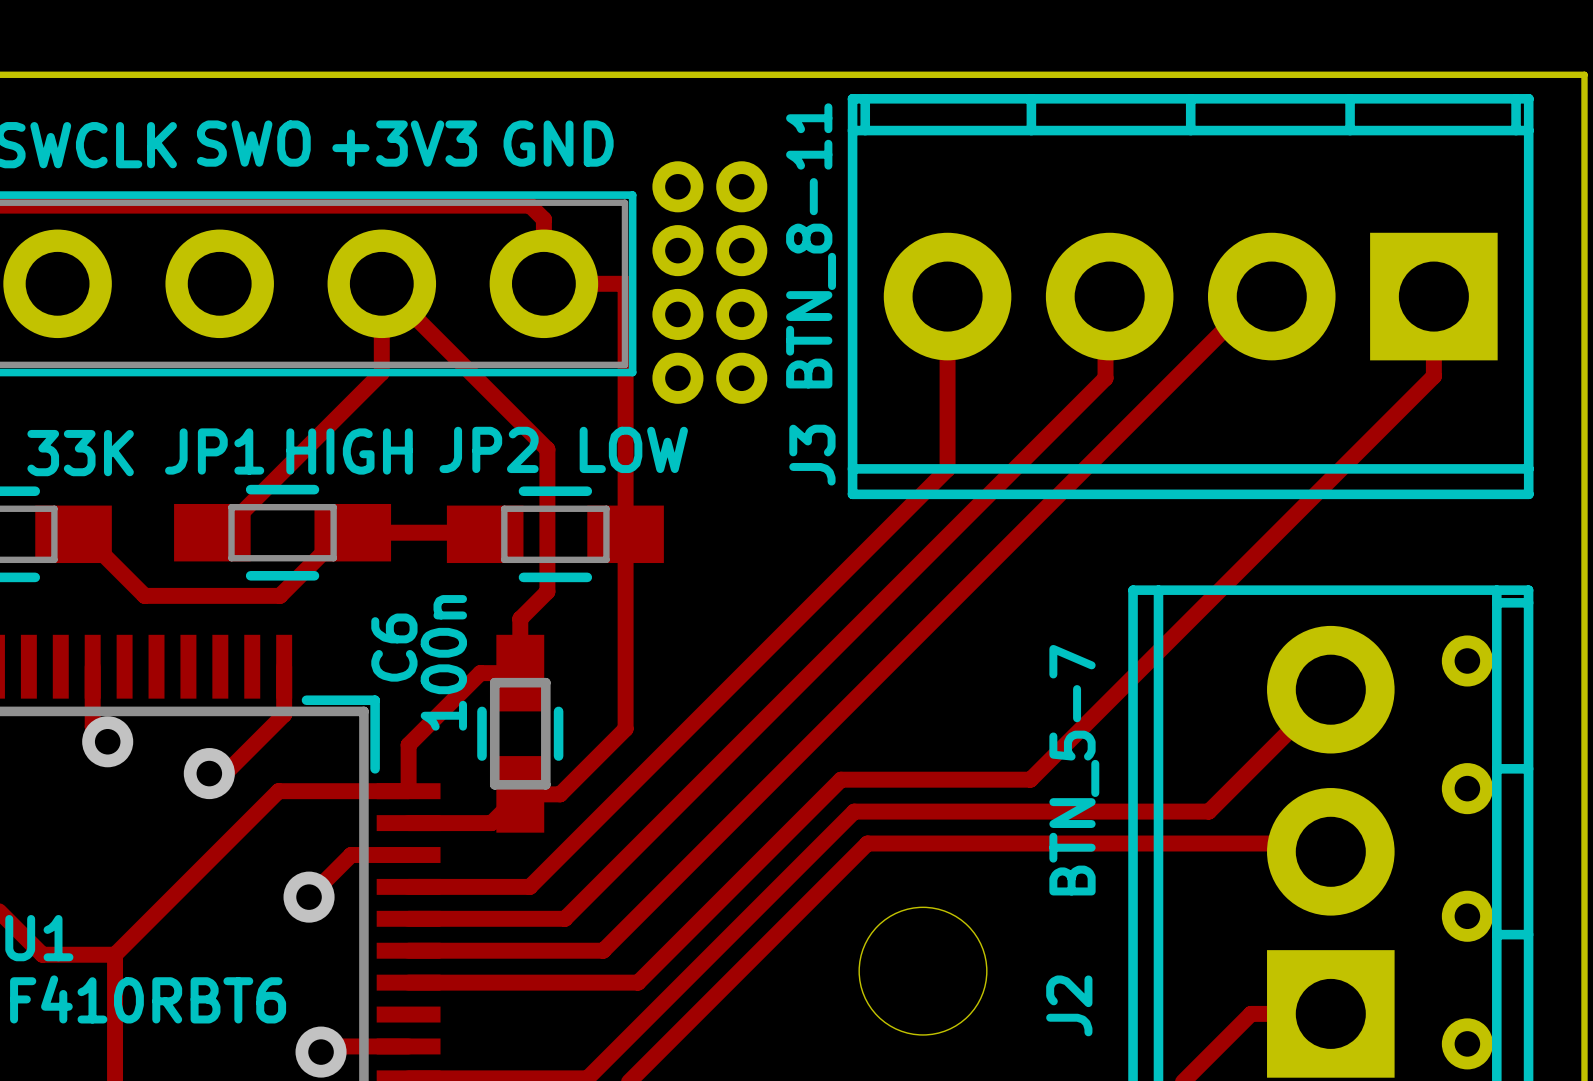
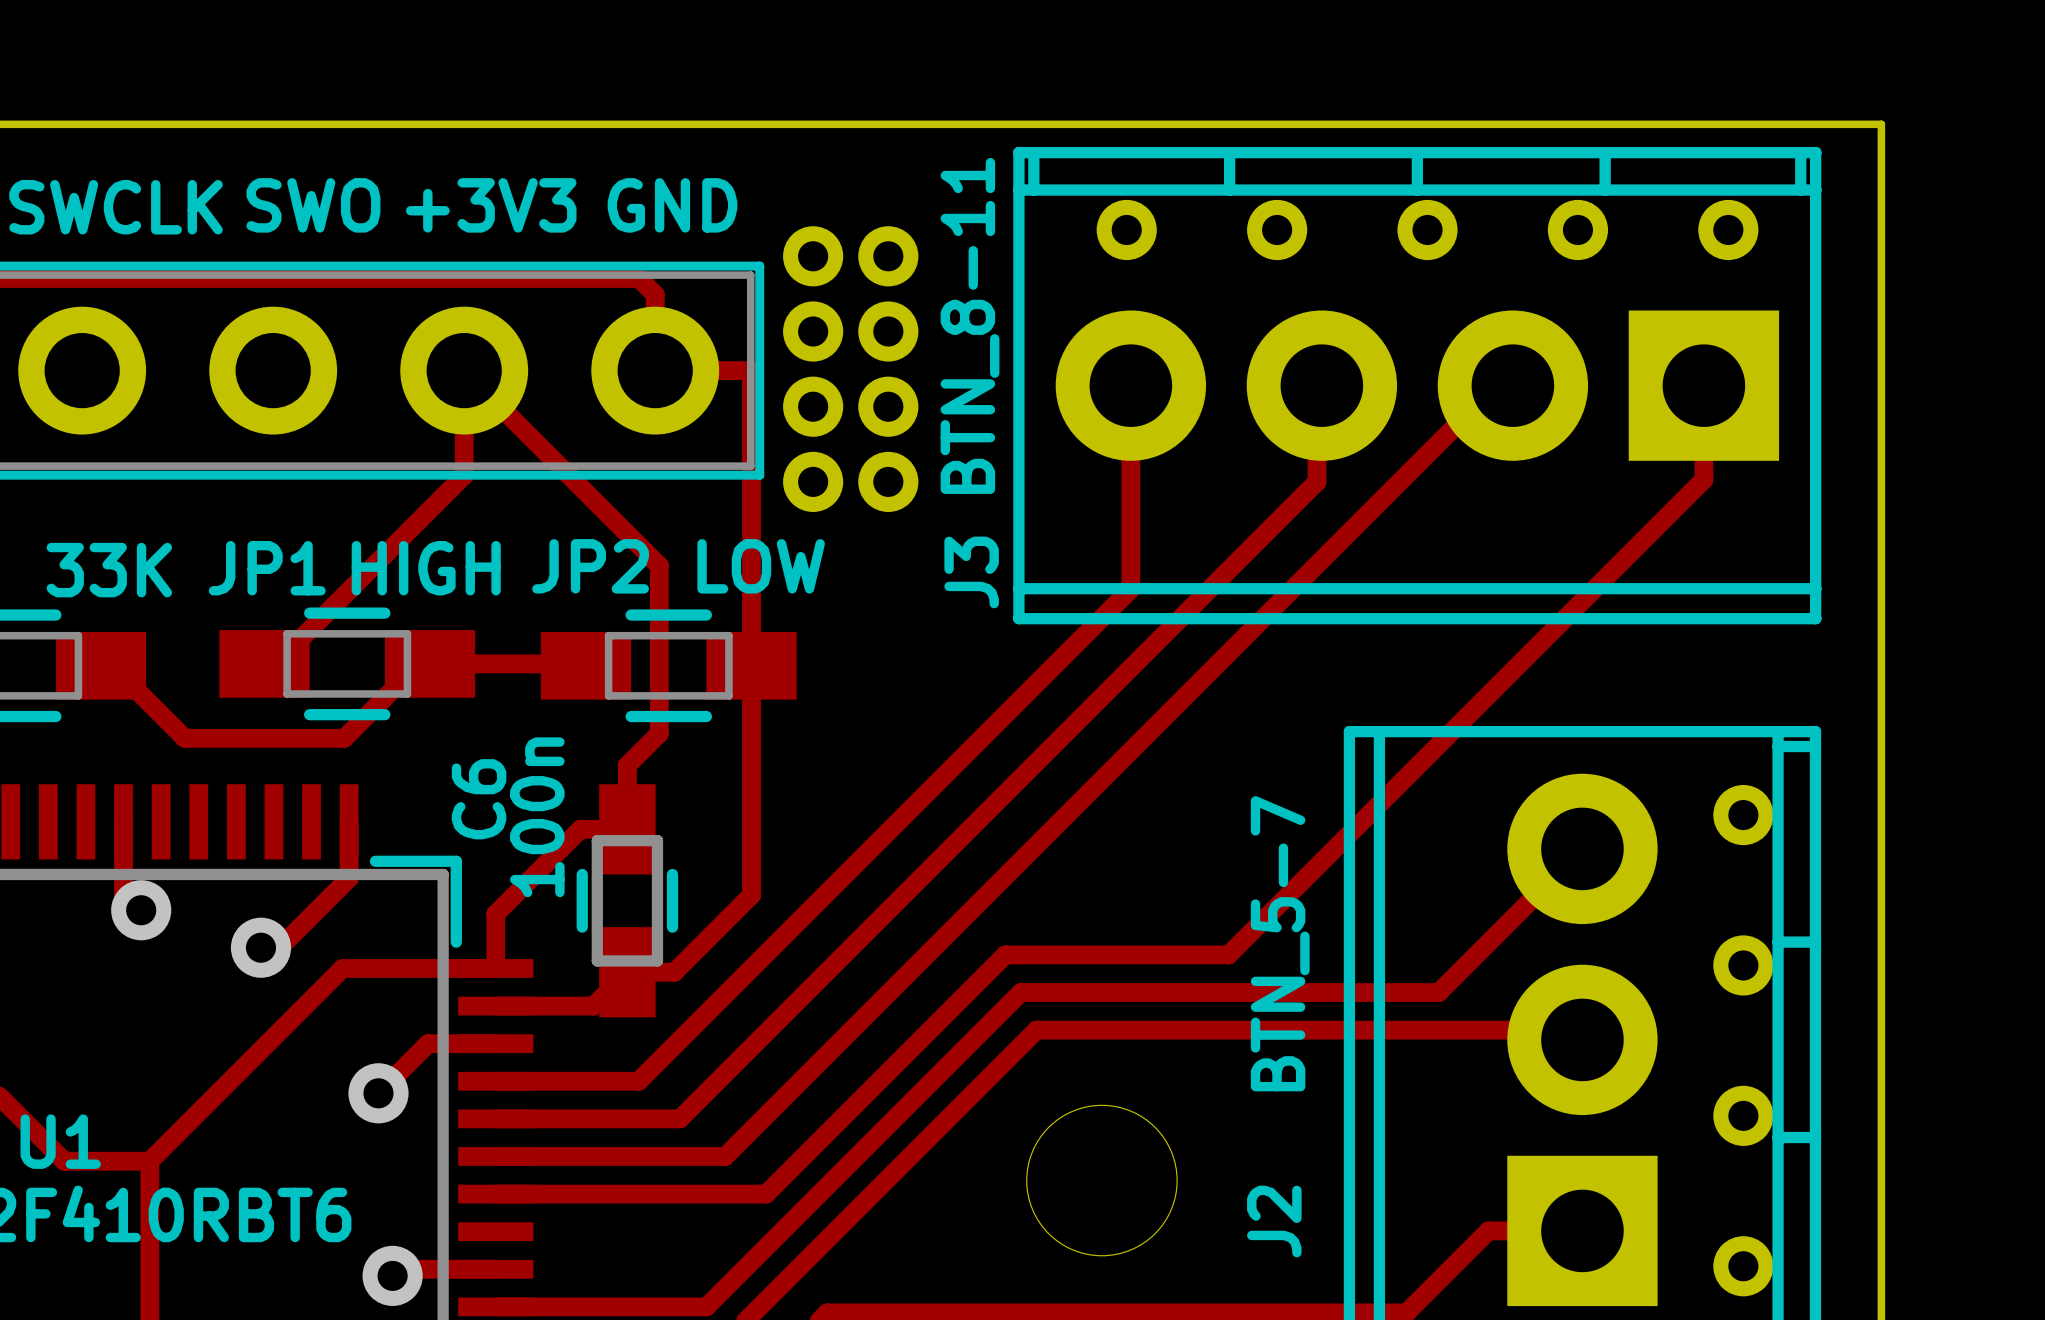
part: none -> (1126, 229)
part: none -> (1277, 229)
part: none -> (1427, 229)
part: none -> (1577, 229)
part: none -> (1728, 229)

